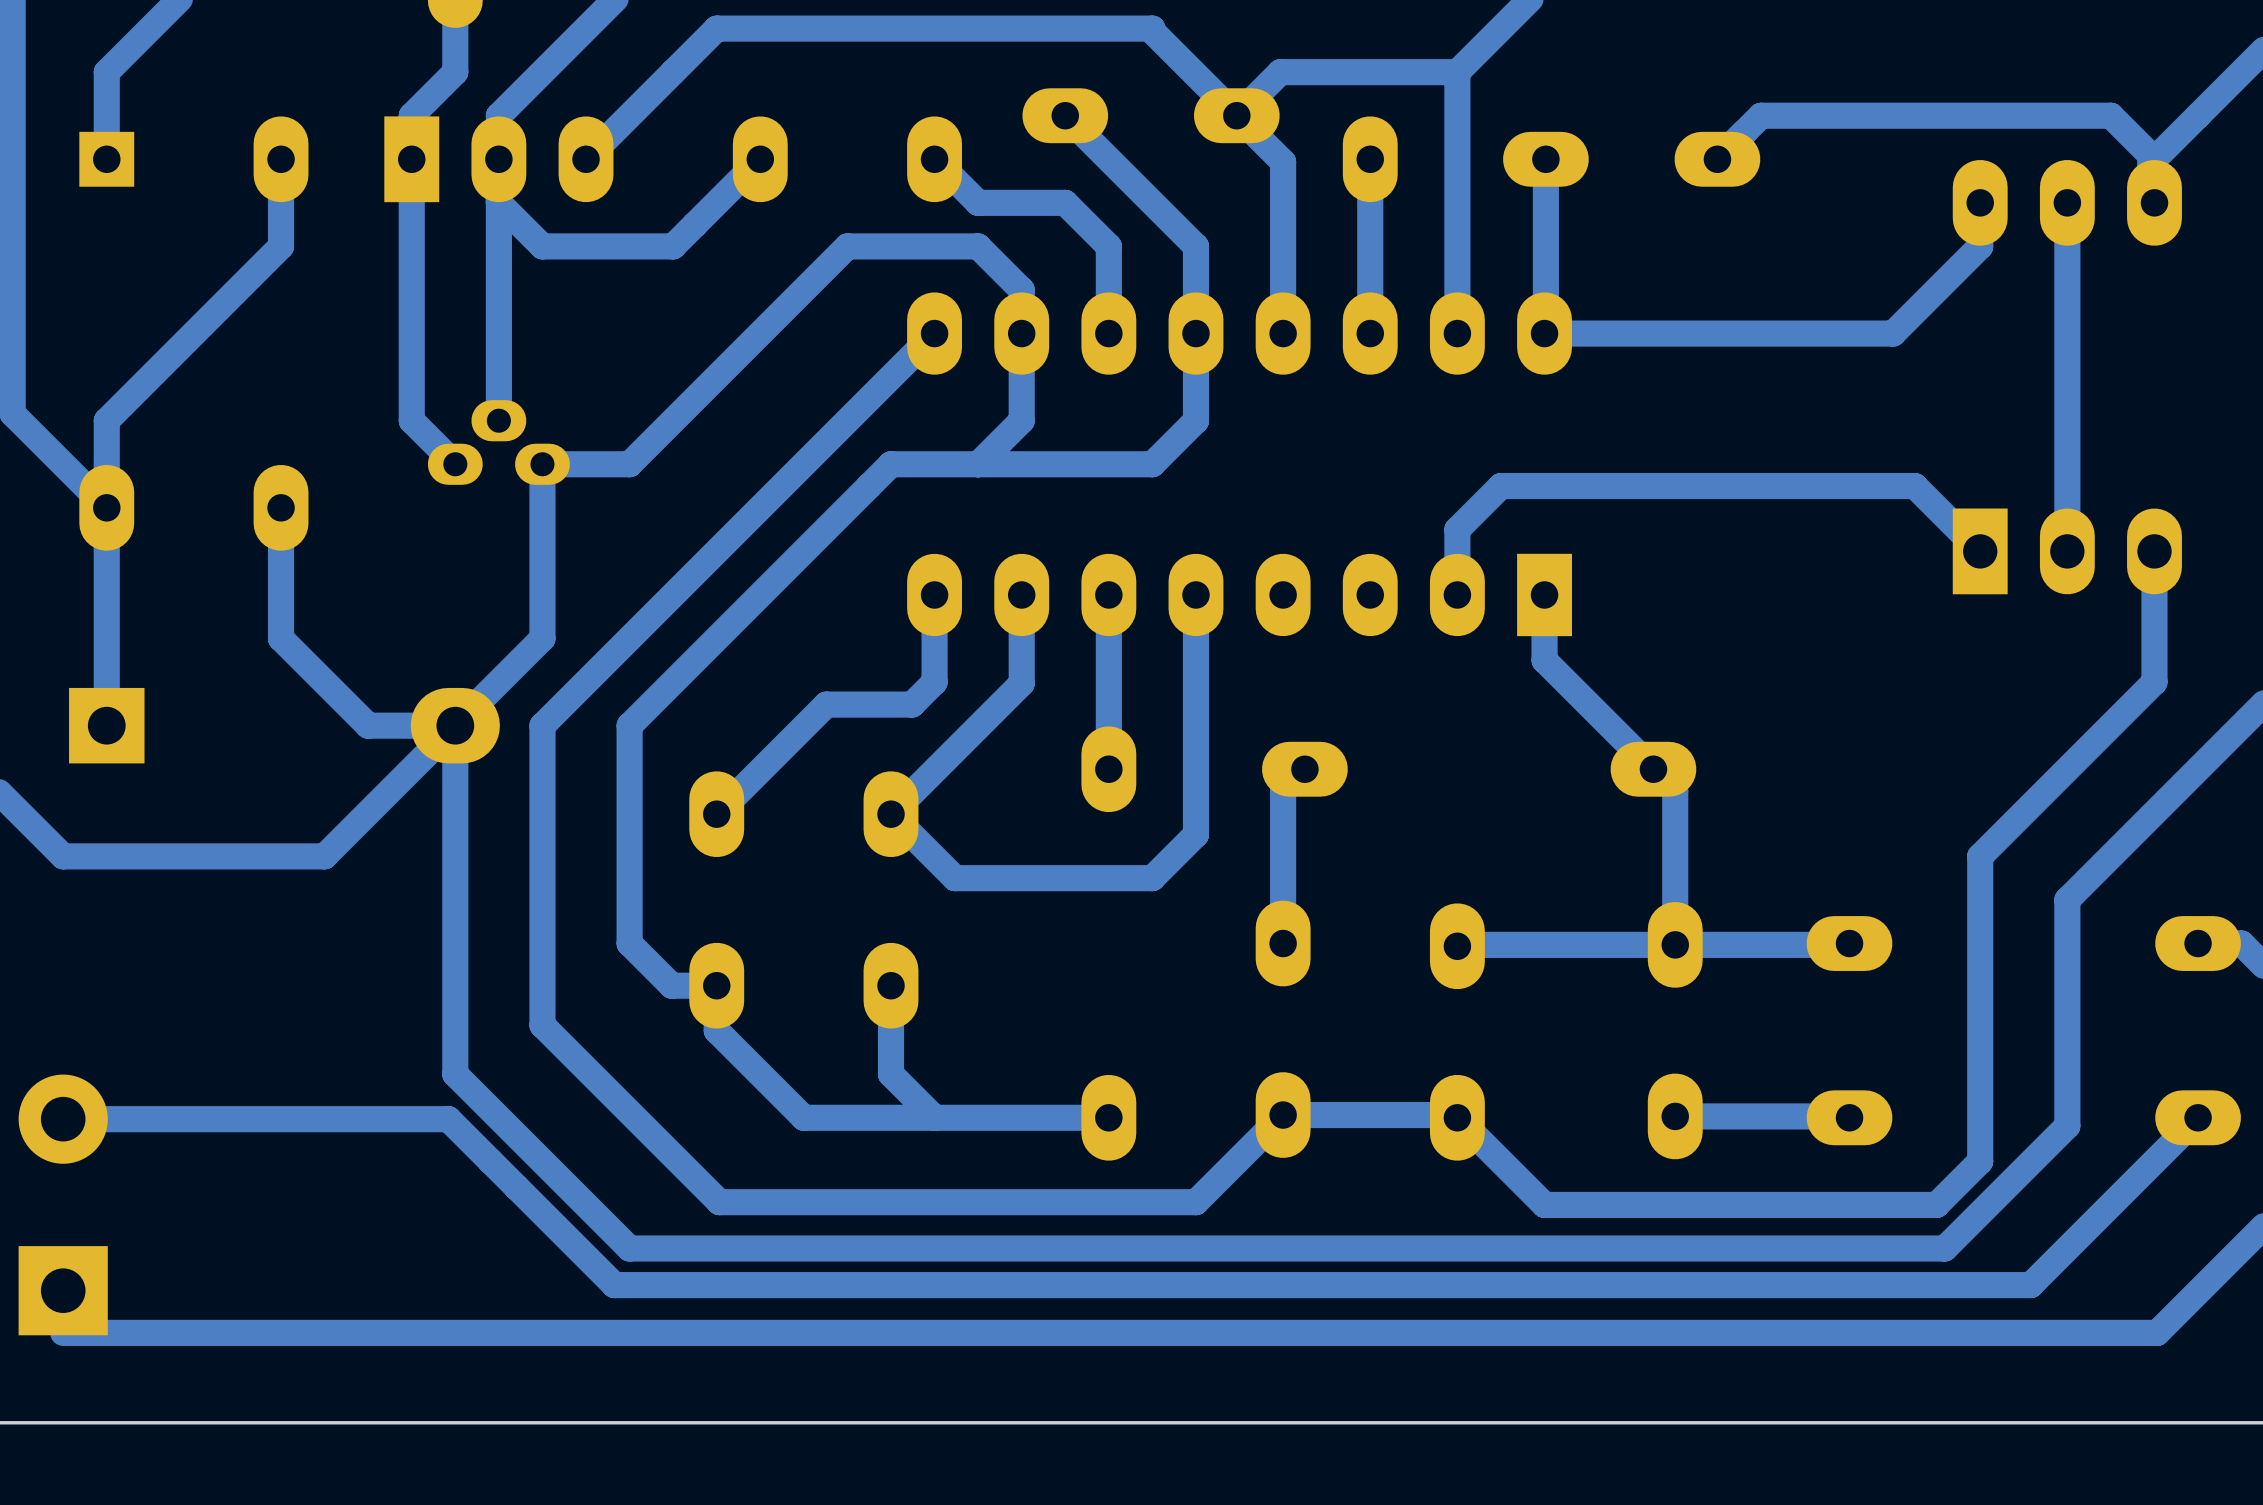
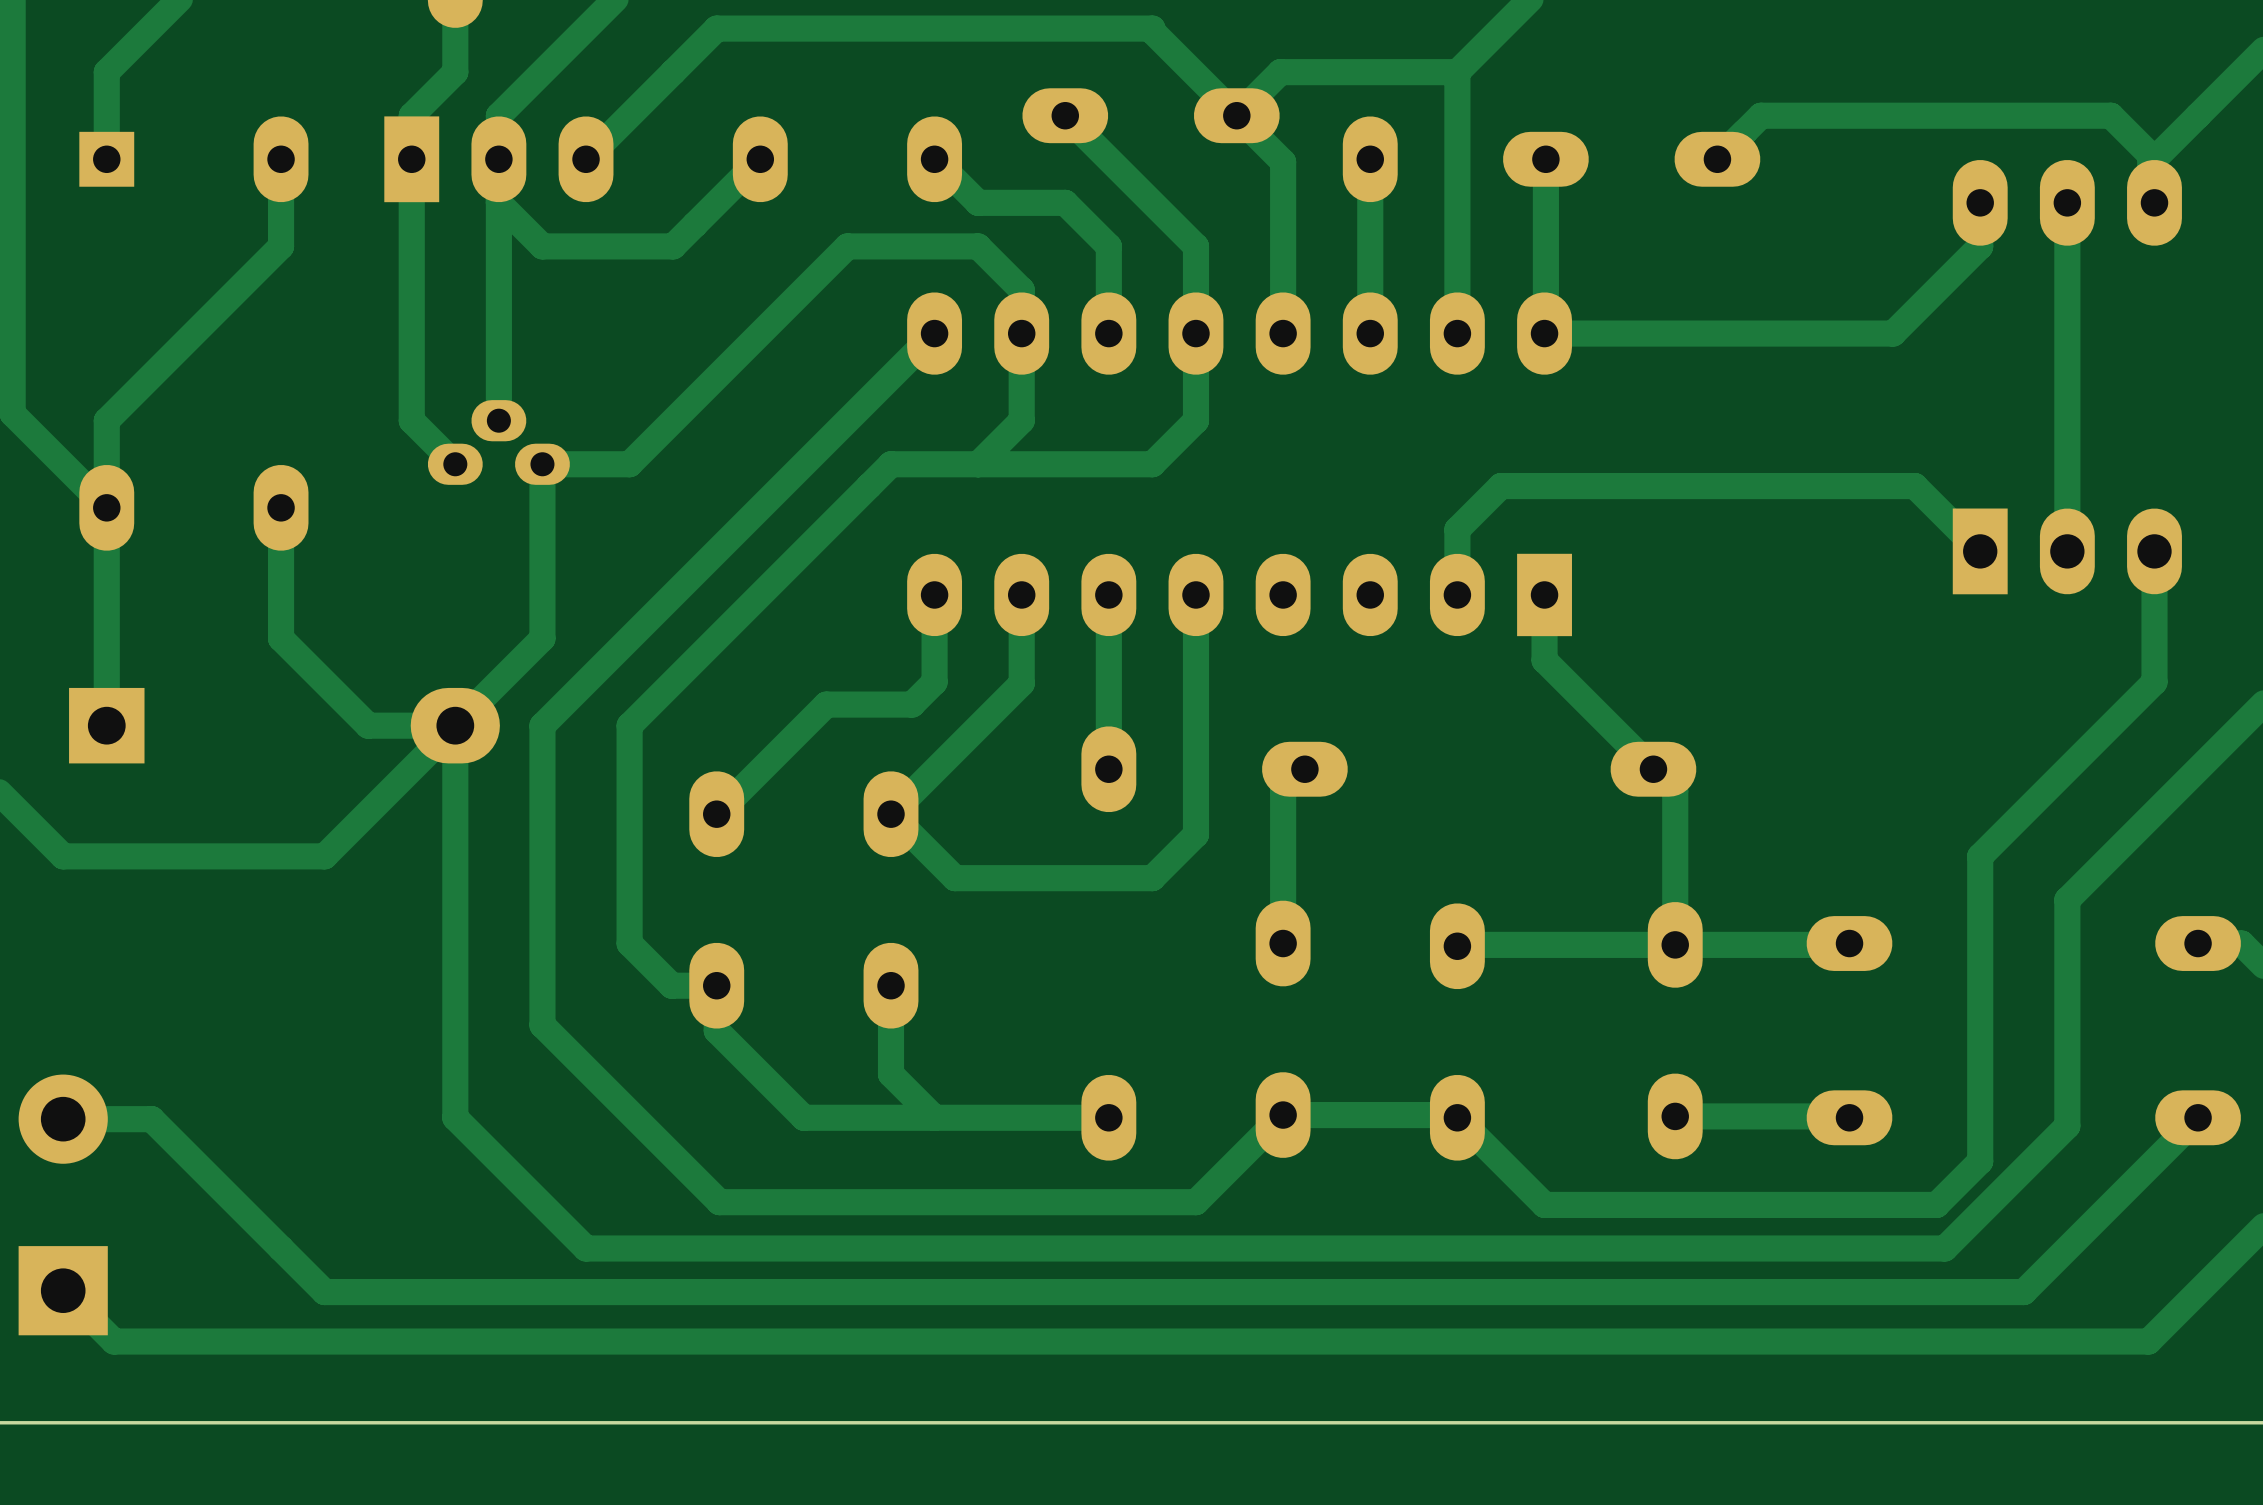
track: (455, 1074) (629, 1248) -> (455, 1074) (455, 1117) (586, 1248) (629, 1248)
track: (151, 1119) (448, 1119) (614, 1285) (2030, 1285) -> (151, 1119) (324, 1292) (2023, 1292) (2030, 1285)
track: (2157, 1332) (63, 1332) -> (2157, 1332) (2148, 1341) (114, 1341) (63, 1290)

